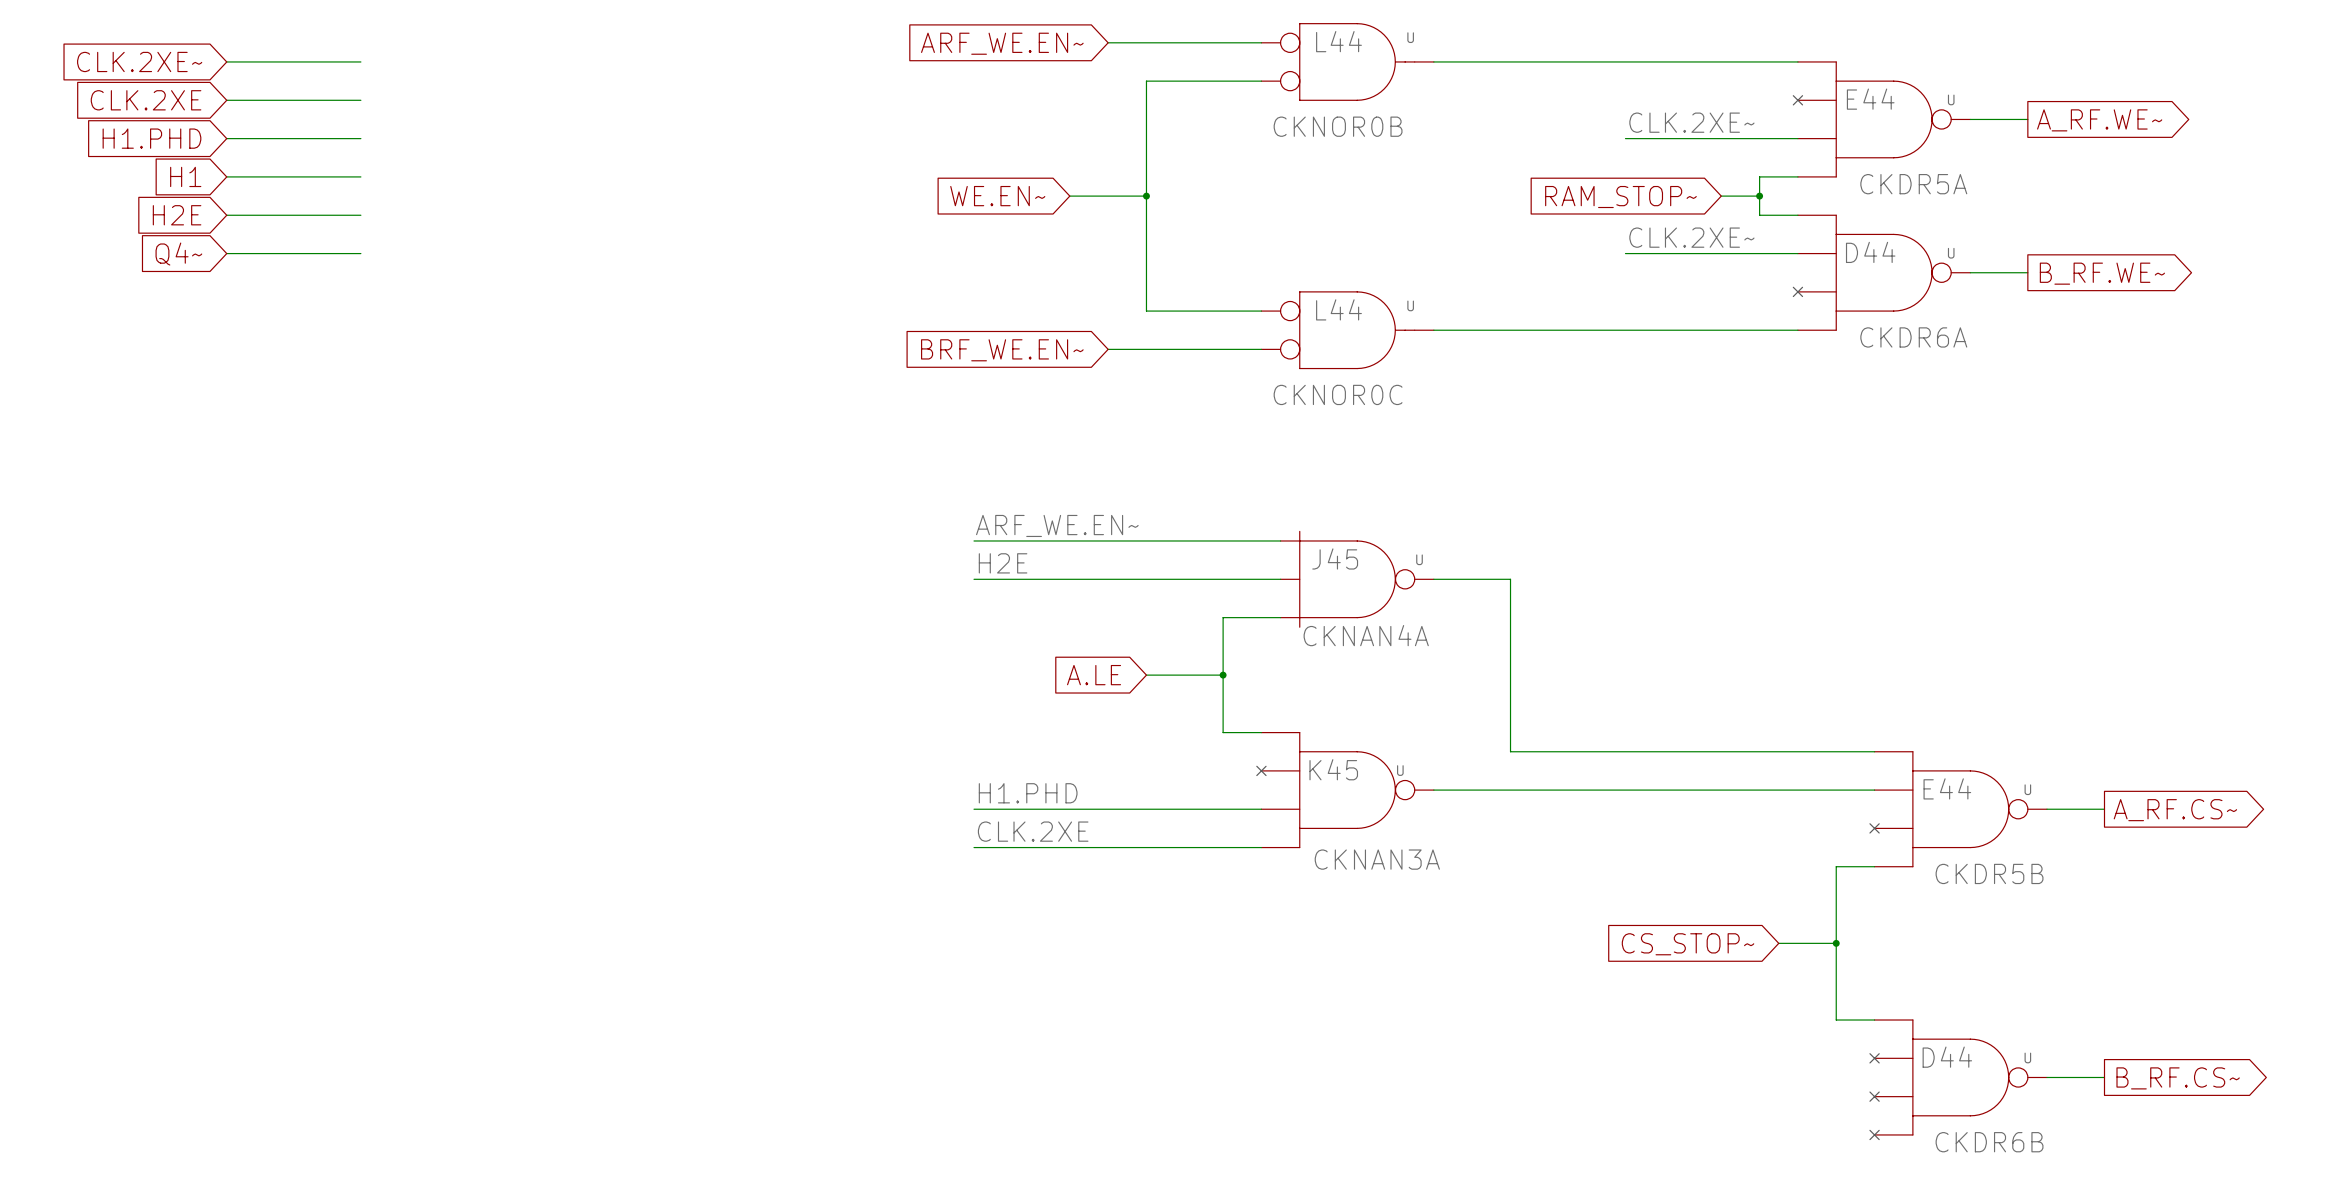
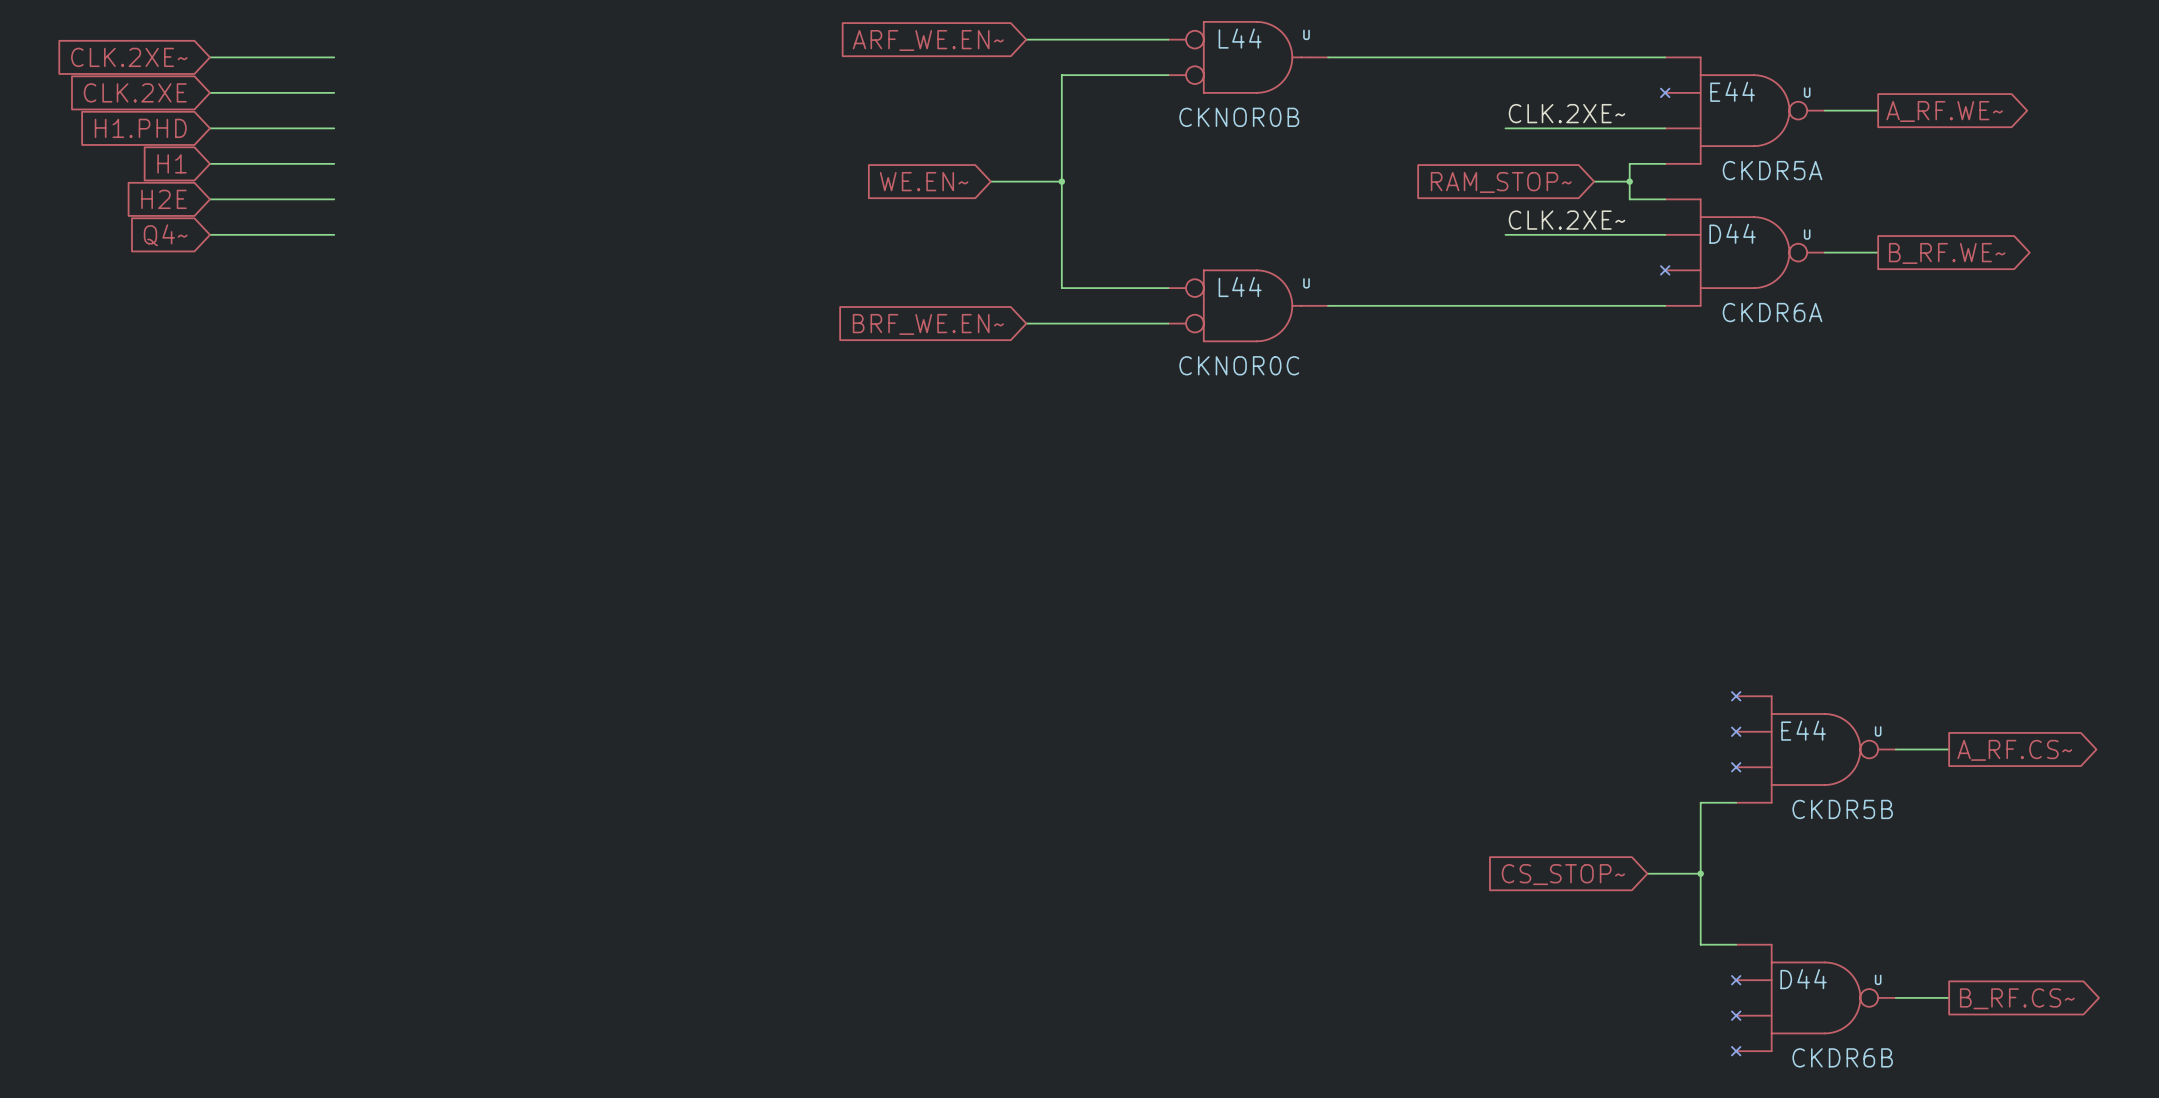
label: ARF_WE.EN~ (1057, 525) -> none
wire: (974, 540) (1280, 540) -> none
label: H2E (1003, 563) -> none
wire: (974, 579) (1280, 579) -> none
U: (1357, 579) -> none
wire: (1433, 579) (1510, 579) (1510, 751) (1874, 751) -> none
wire: (1280, 617) (1223, 617) (1223, 732) (1261, 732) -> none
global label: A.LE (1094, 675) -> none
wire: (1146, 675) (1223, 675) -> none
junction: (1223, 675) -> none
no-connect mark: none -> (1736, 696)
no-connect mark: (1261, 770) -> none
U: (1347, 790) -> none
wire: (1433, 790) (1874, 790) -> none
no-connect mark: none -> (1736, 731)
label: H1.PHD (1028, 793) -> none
wire: (974, 809) (1261, 809) -> none
label: CLK.2XE (1033, 831) -> none
wire: (974, 847) (1261, 847) -> none

